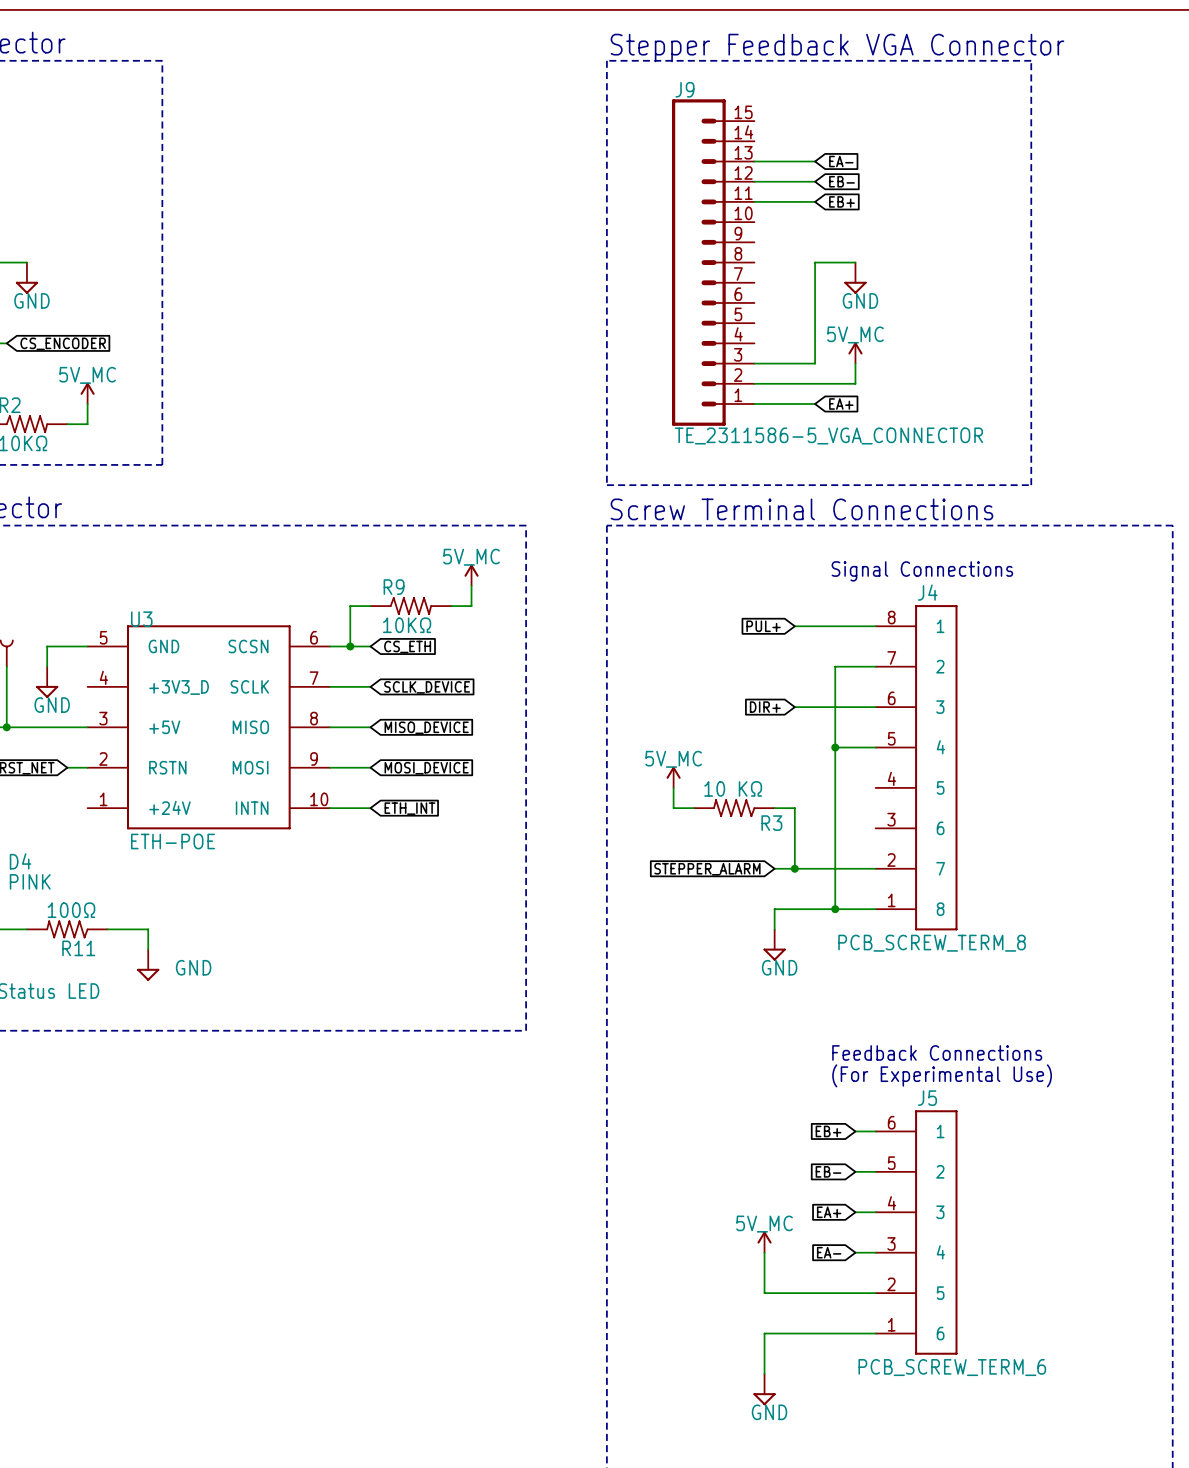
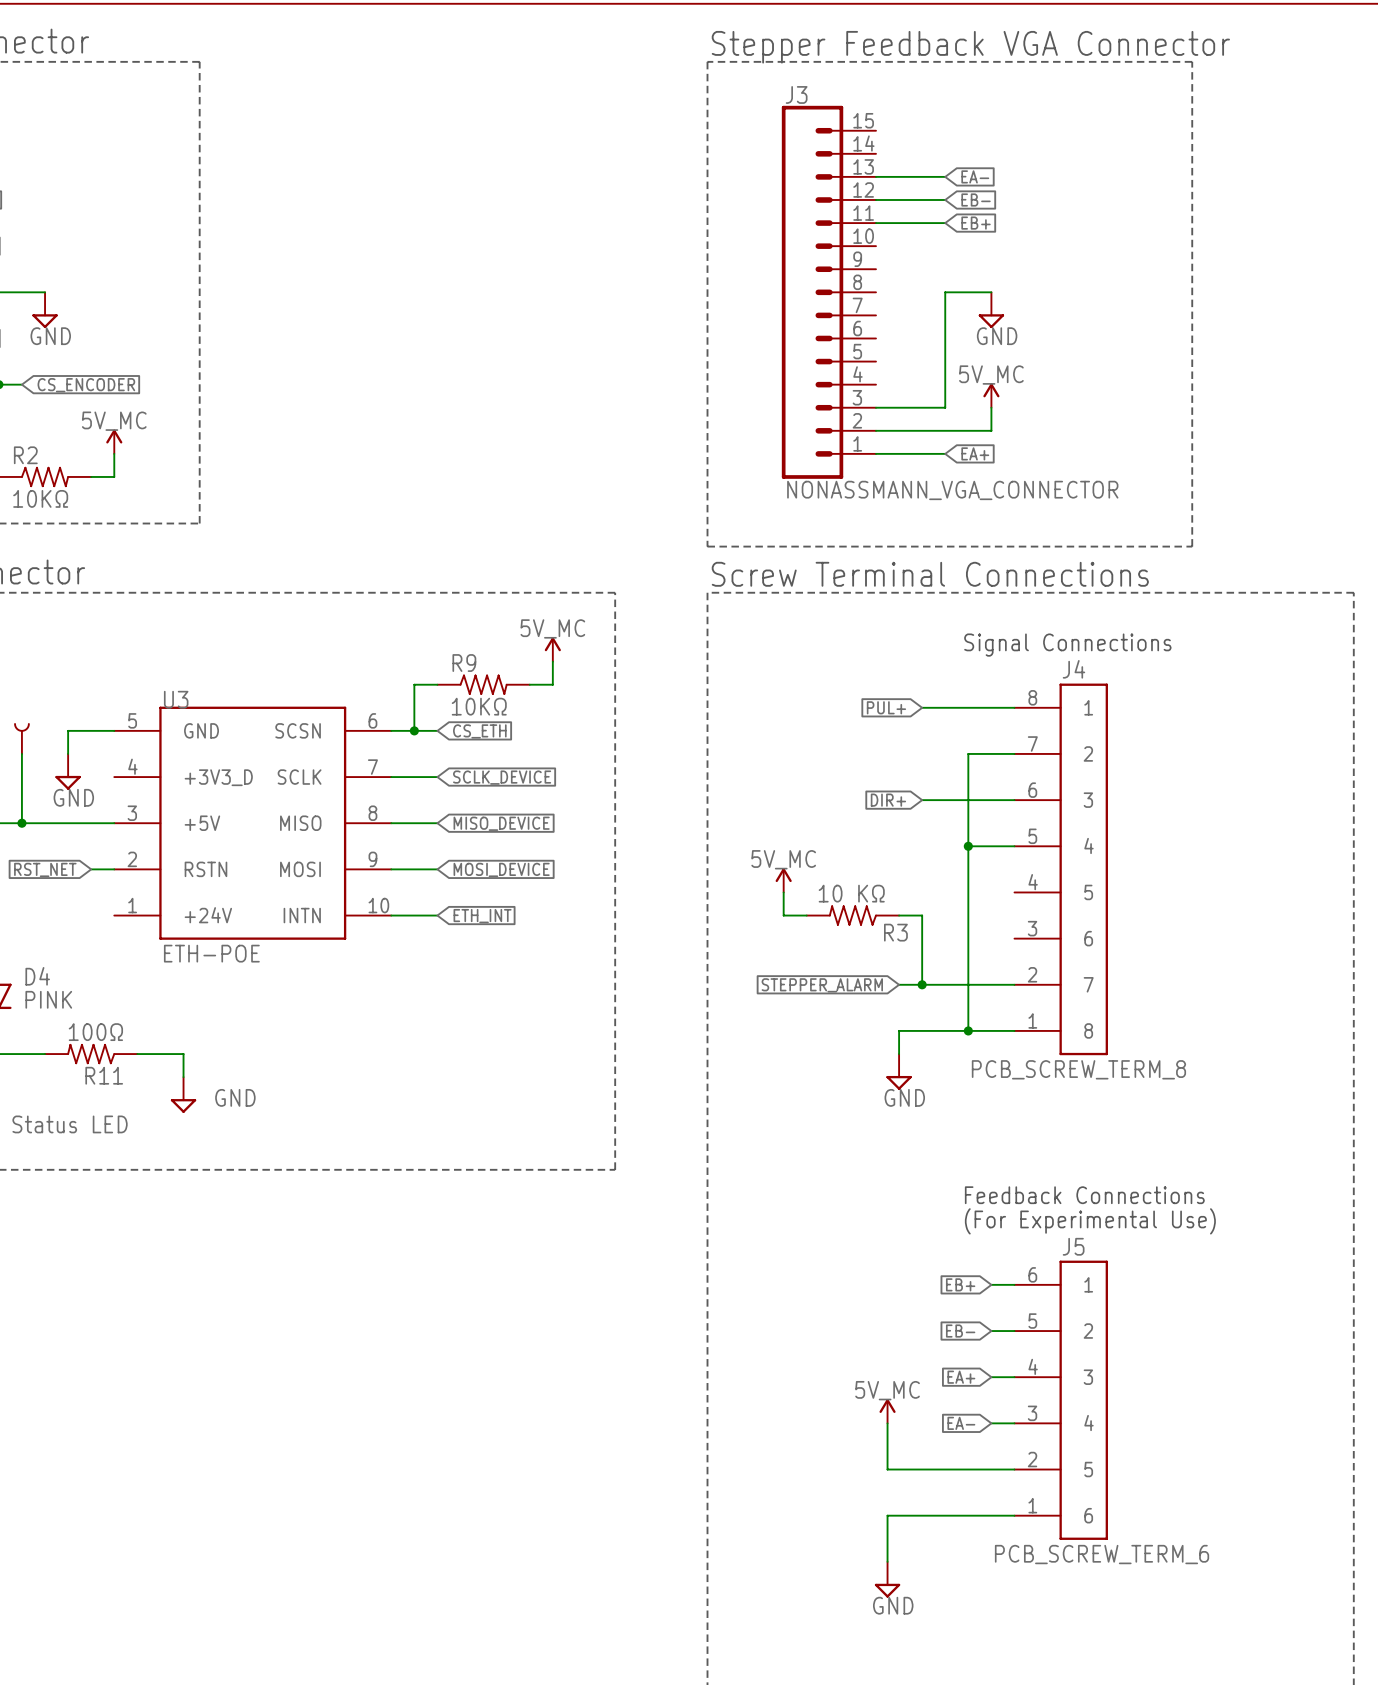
J9 name: J9 (684, 89) -> J3 (796, 94)
J9 value: TE_2311586-5_VGA_CONNECTOR (828, 436) -> NONASSMANN_VGA_CONNECTOR (952, 490)

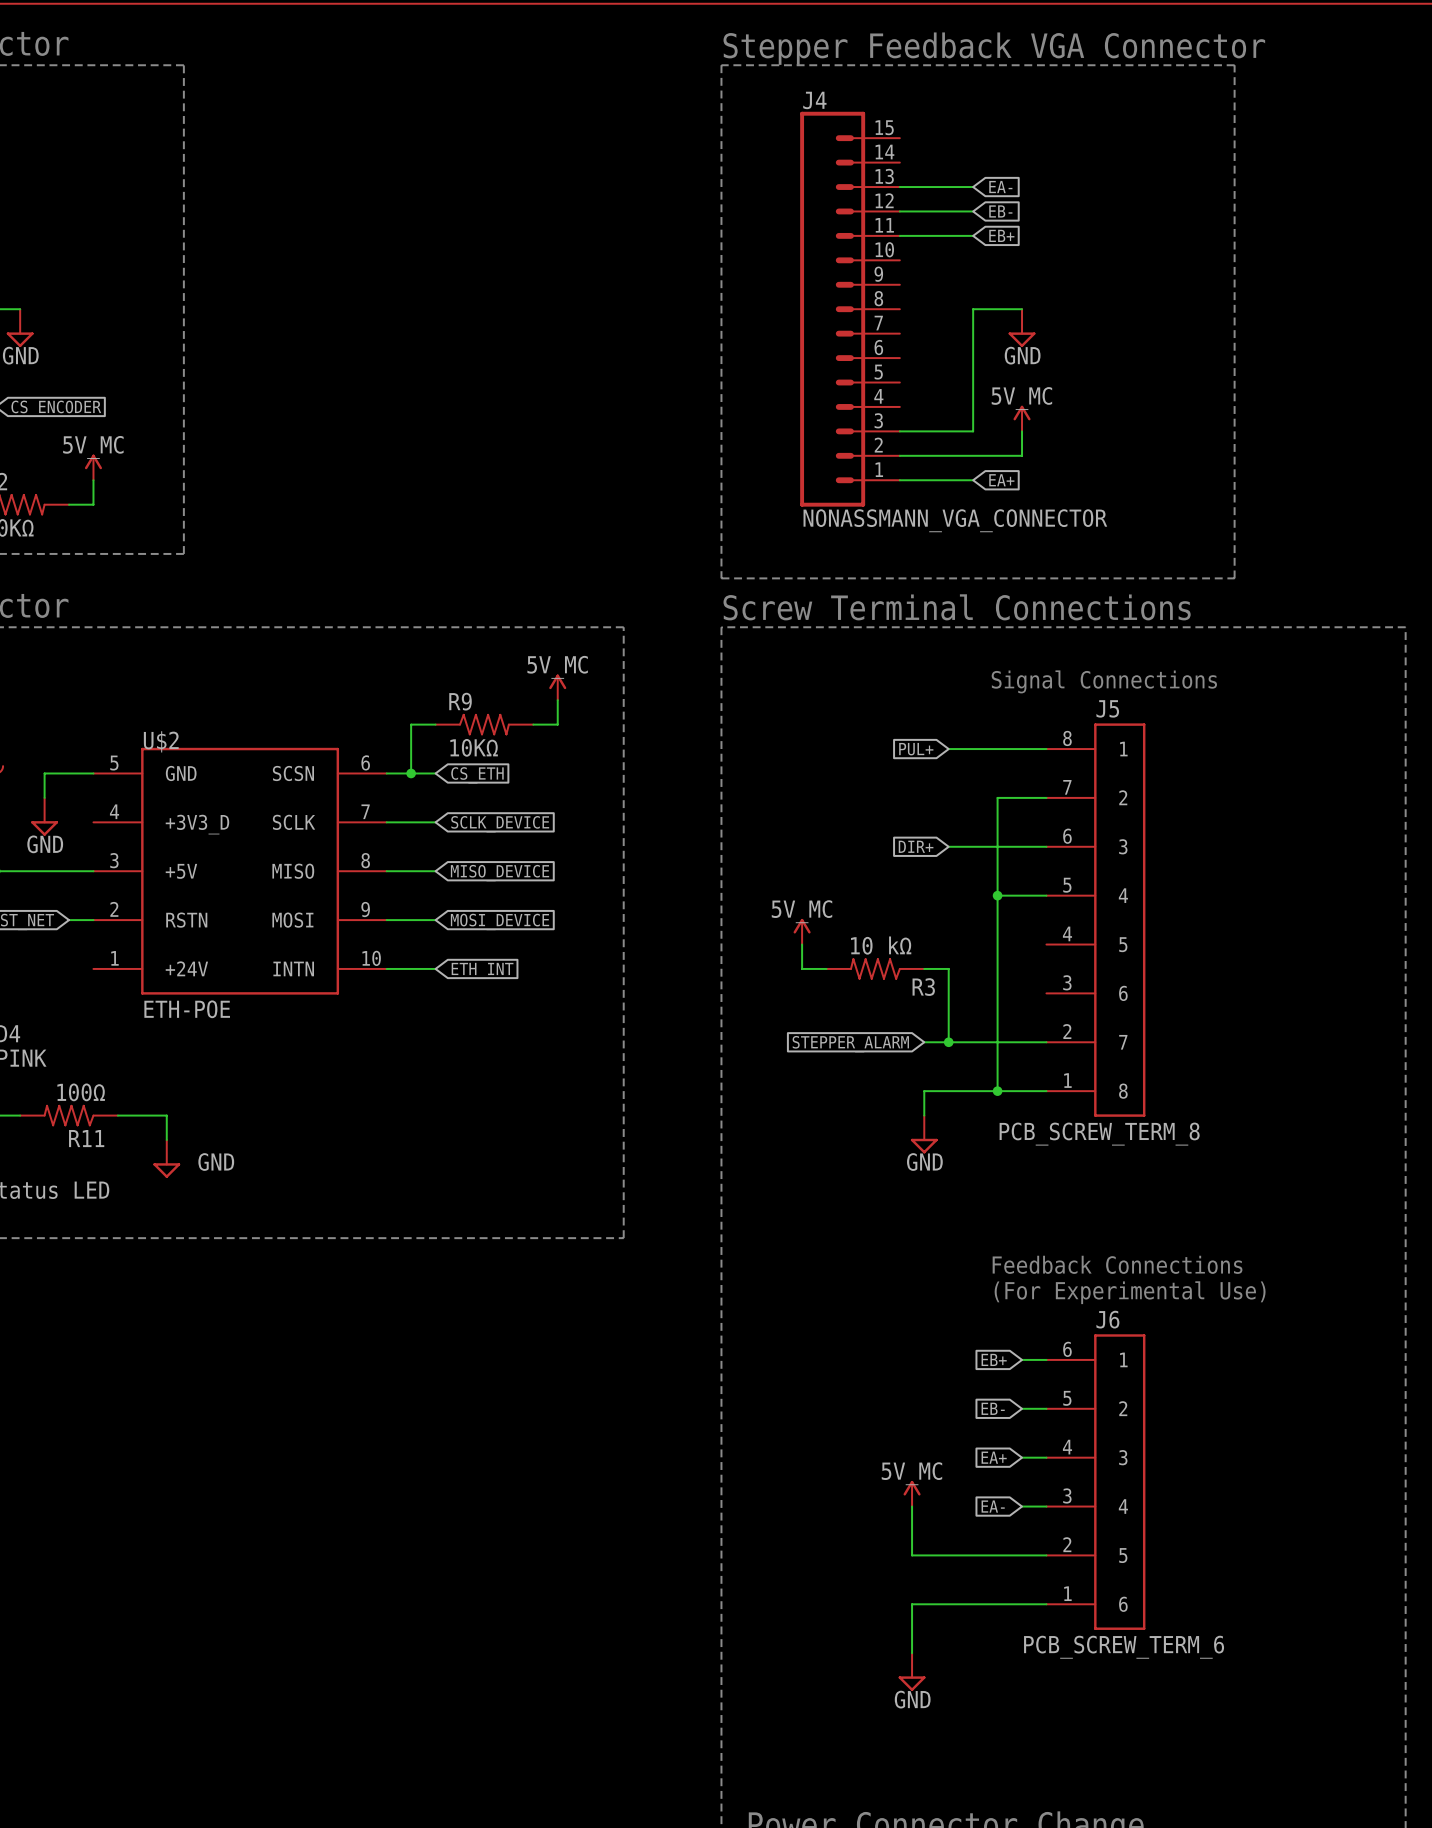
J3 name: J3 (796, 94) -> J4 (814, 100)
J4 name: J4 (1073, 669) -> J5 (1107, 708)
U3 name: U3 (176, 699) -> U$2 (161, 741)
R3 value: 10 KΩ (851, 893) -> 10 kΩ (881, 945)
J5 name: J5 (1073, 1246) -> J6 (1107, 1319)

